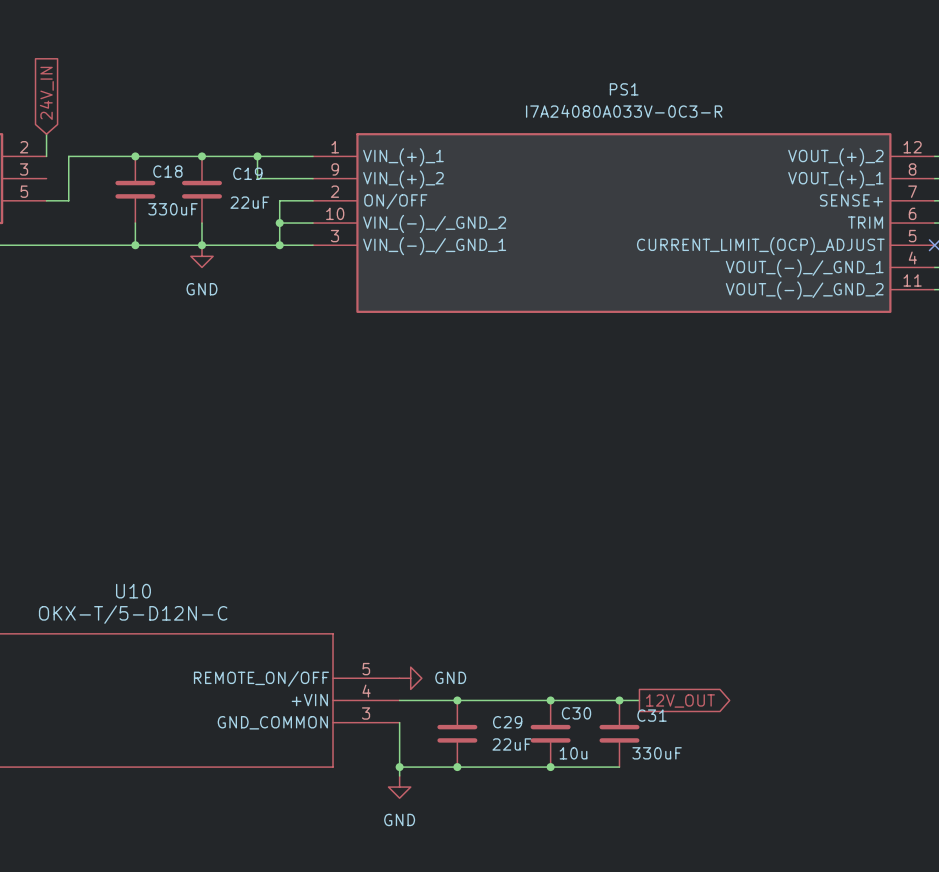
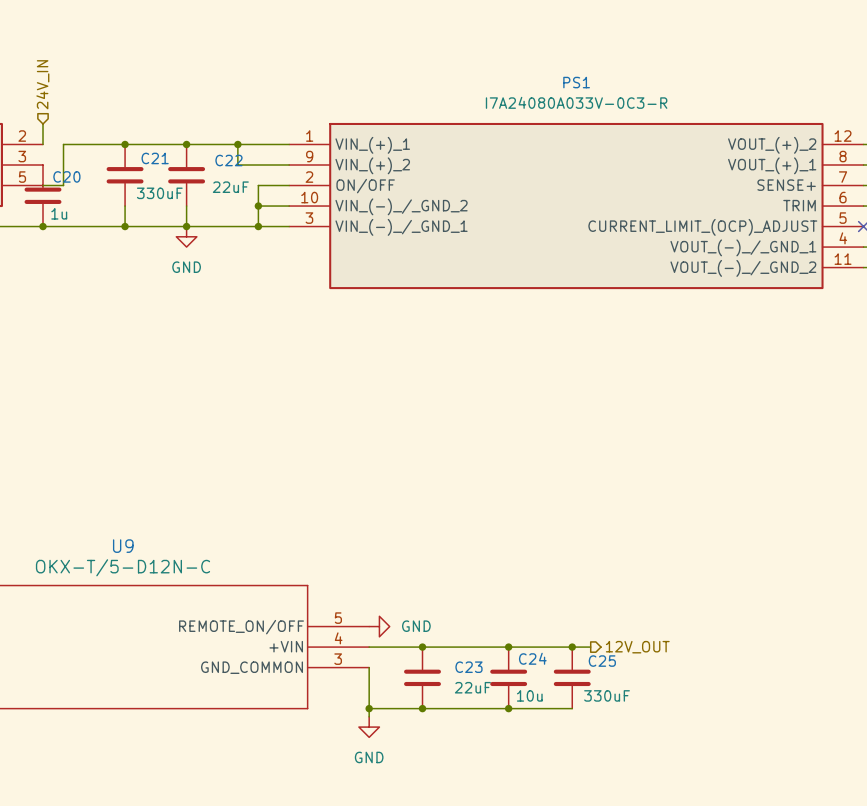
hierarchical label: none -> 24V_IN (42, 84)
global label: 24V_IN (46, 93) -> none
C18 name: C18 (167, 171) -> C21 (155, 158)
C19 name: C19 (247, 173) -> C22 (228, 160)
C20: none -> 1u (43, 195)
junction: none -> (43, 226)
U10 name: U10 (133, 591) -> U9 (123, 546)
global label: 12V_OUT (680, 700) -> none
hierarchical label: none -> 12V_OUT (637, 647)
C30 name: C30 (576, 713) -> C24 (532, 658)
C31 name: C31 (652, 715) -> C25 (602, 661)
C29 name: C29 (507, 722) -> C23 (468, 667)

